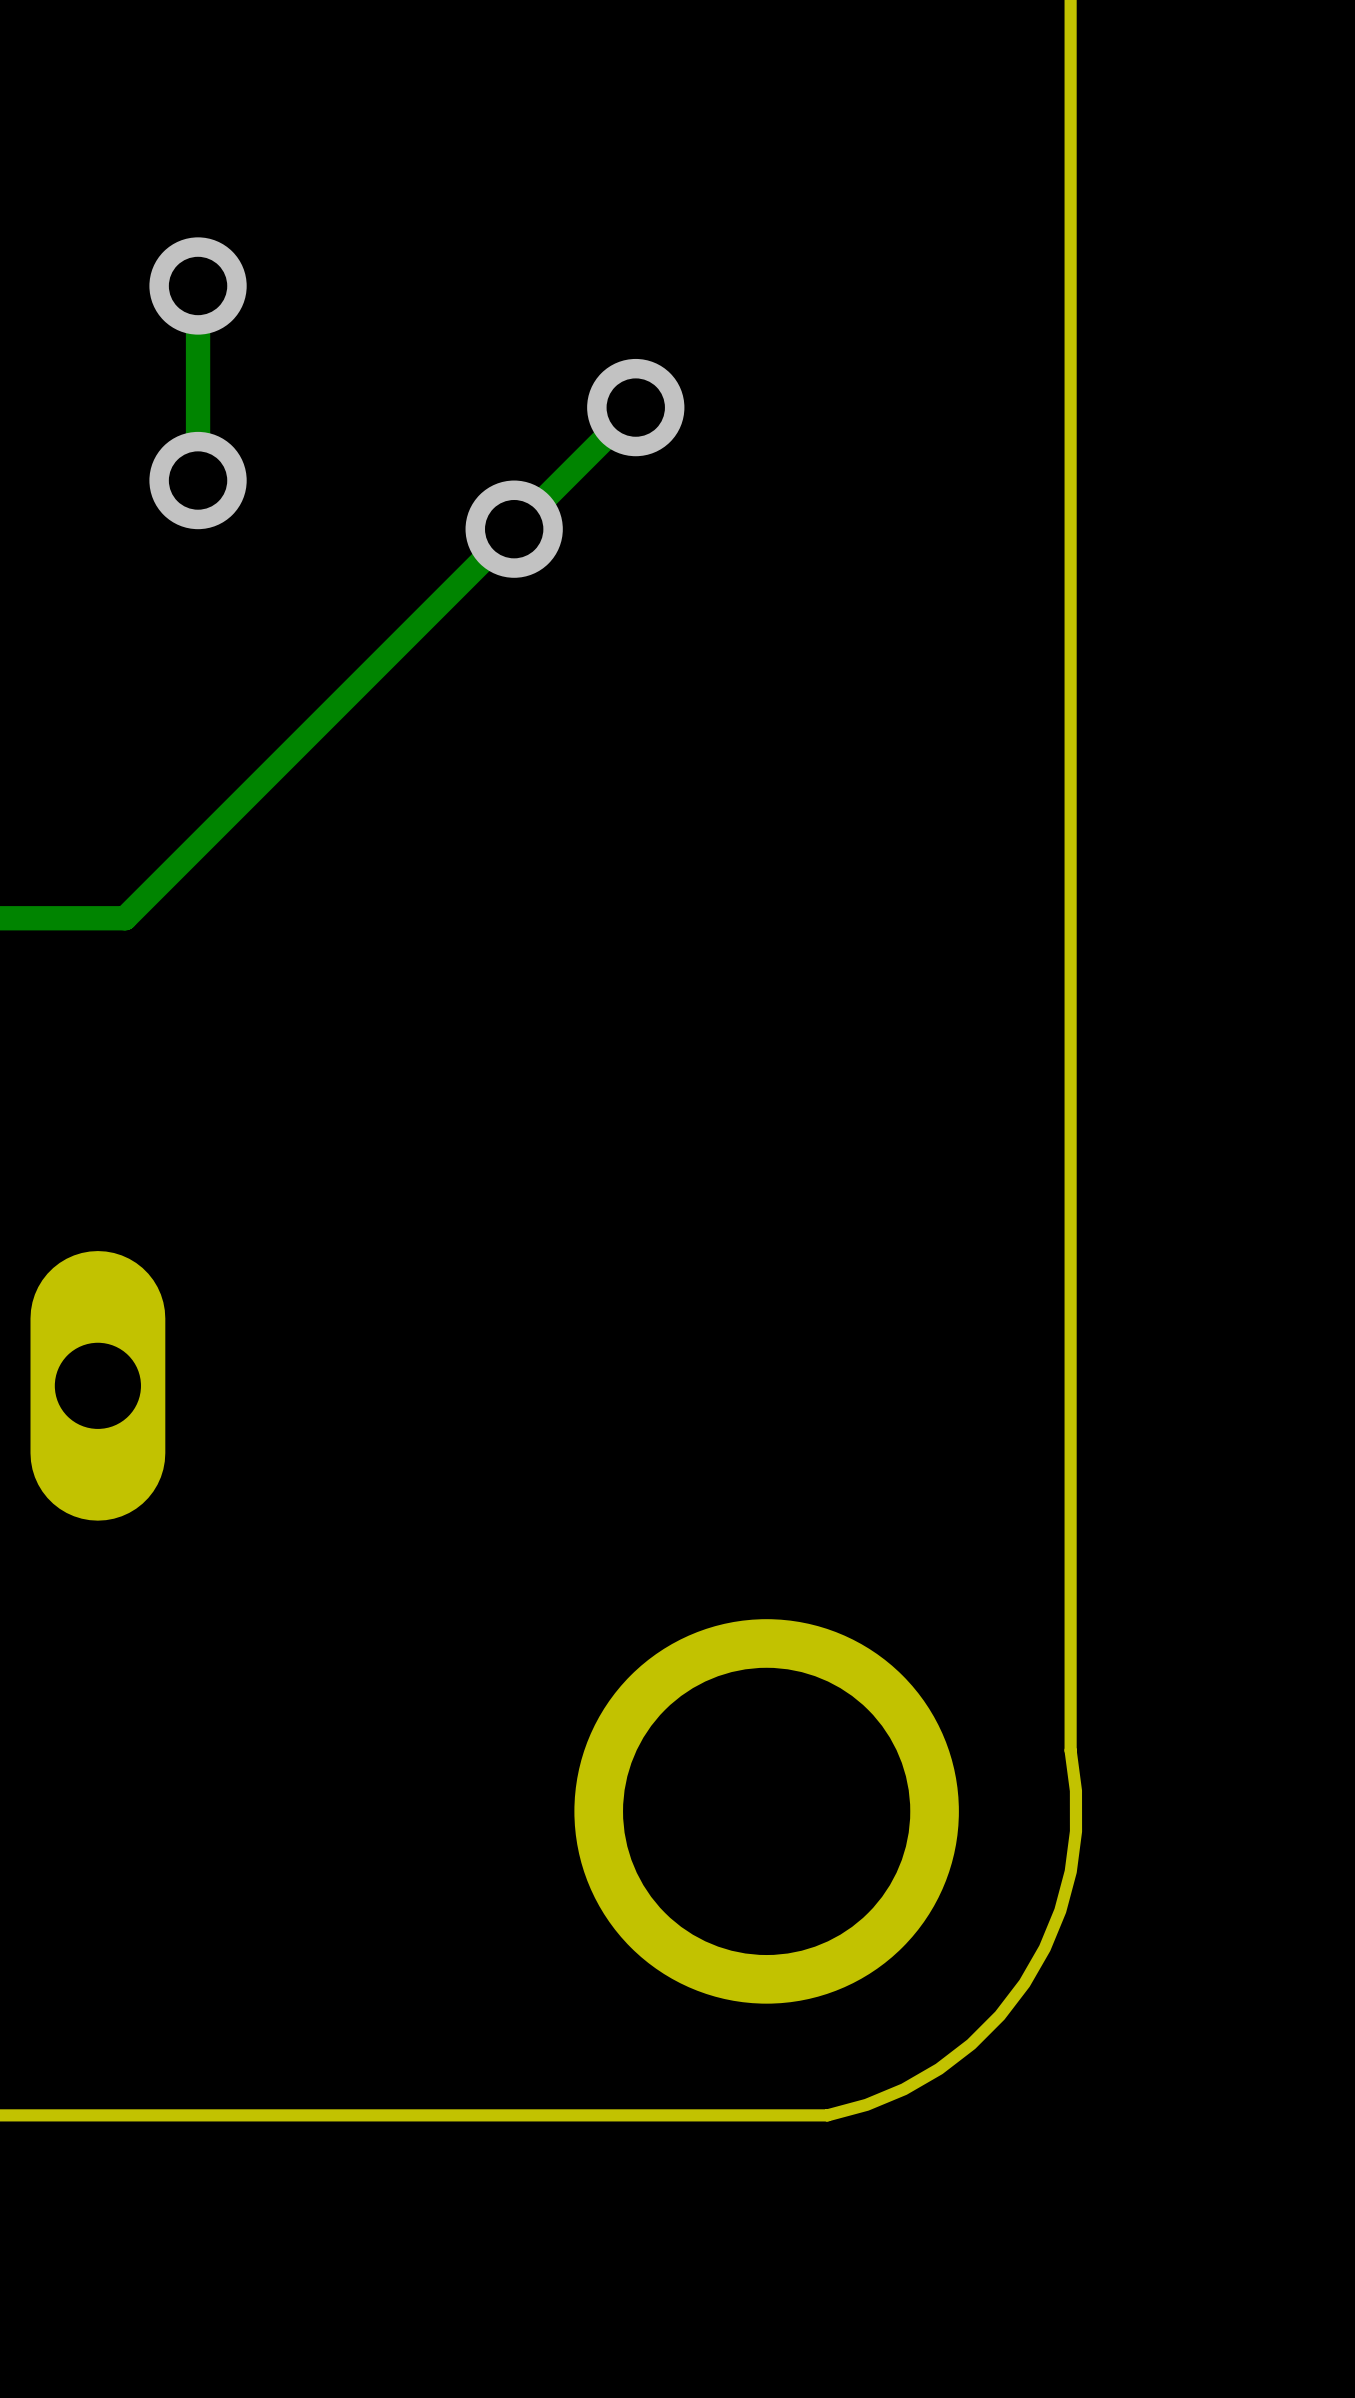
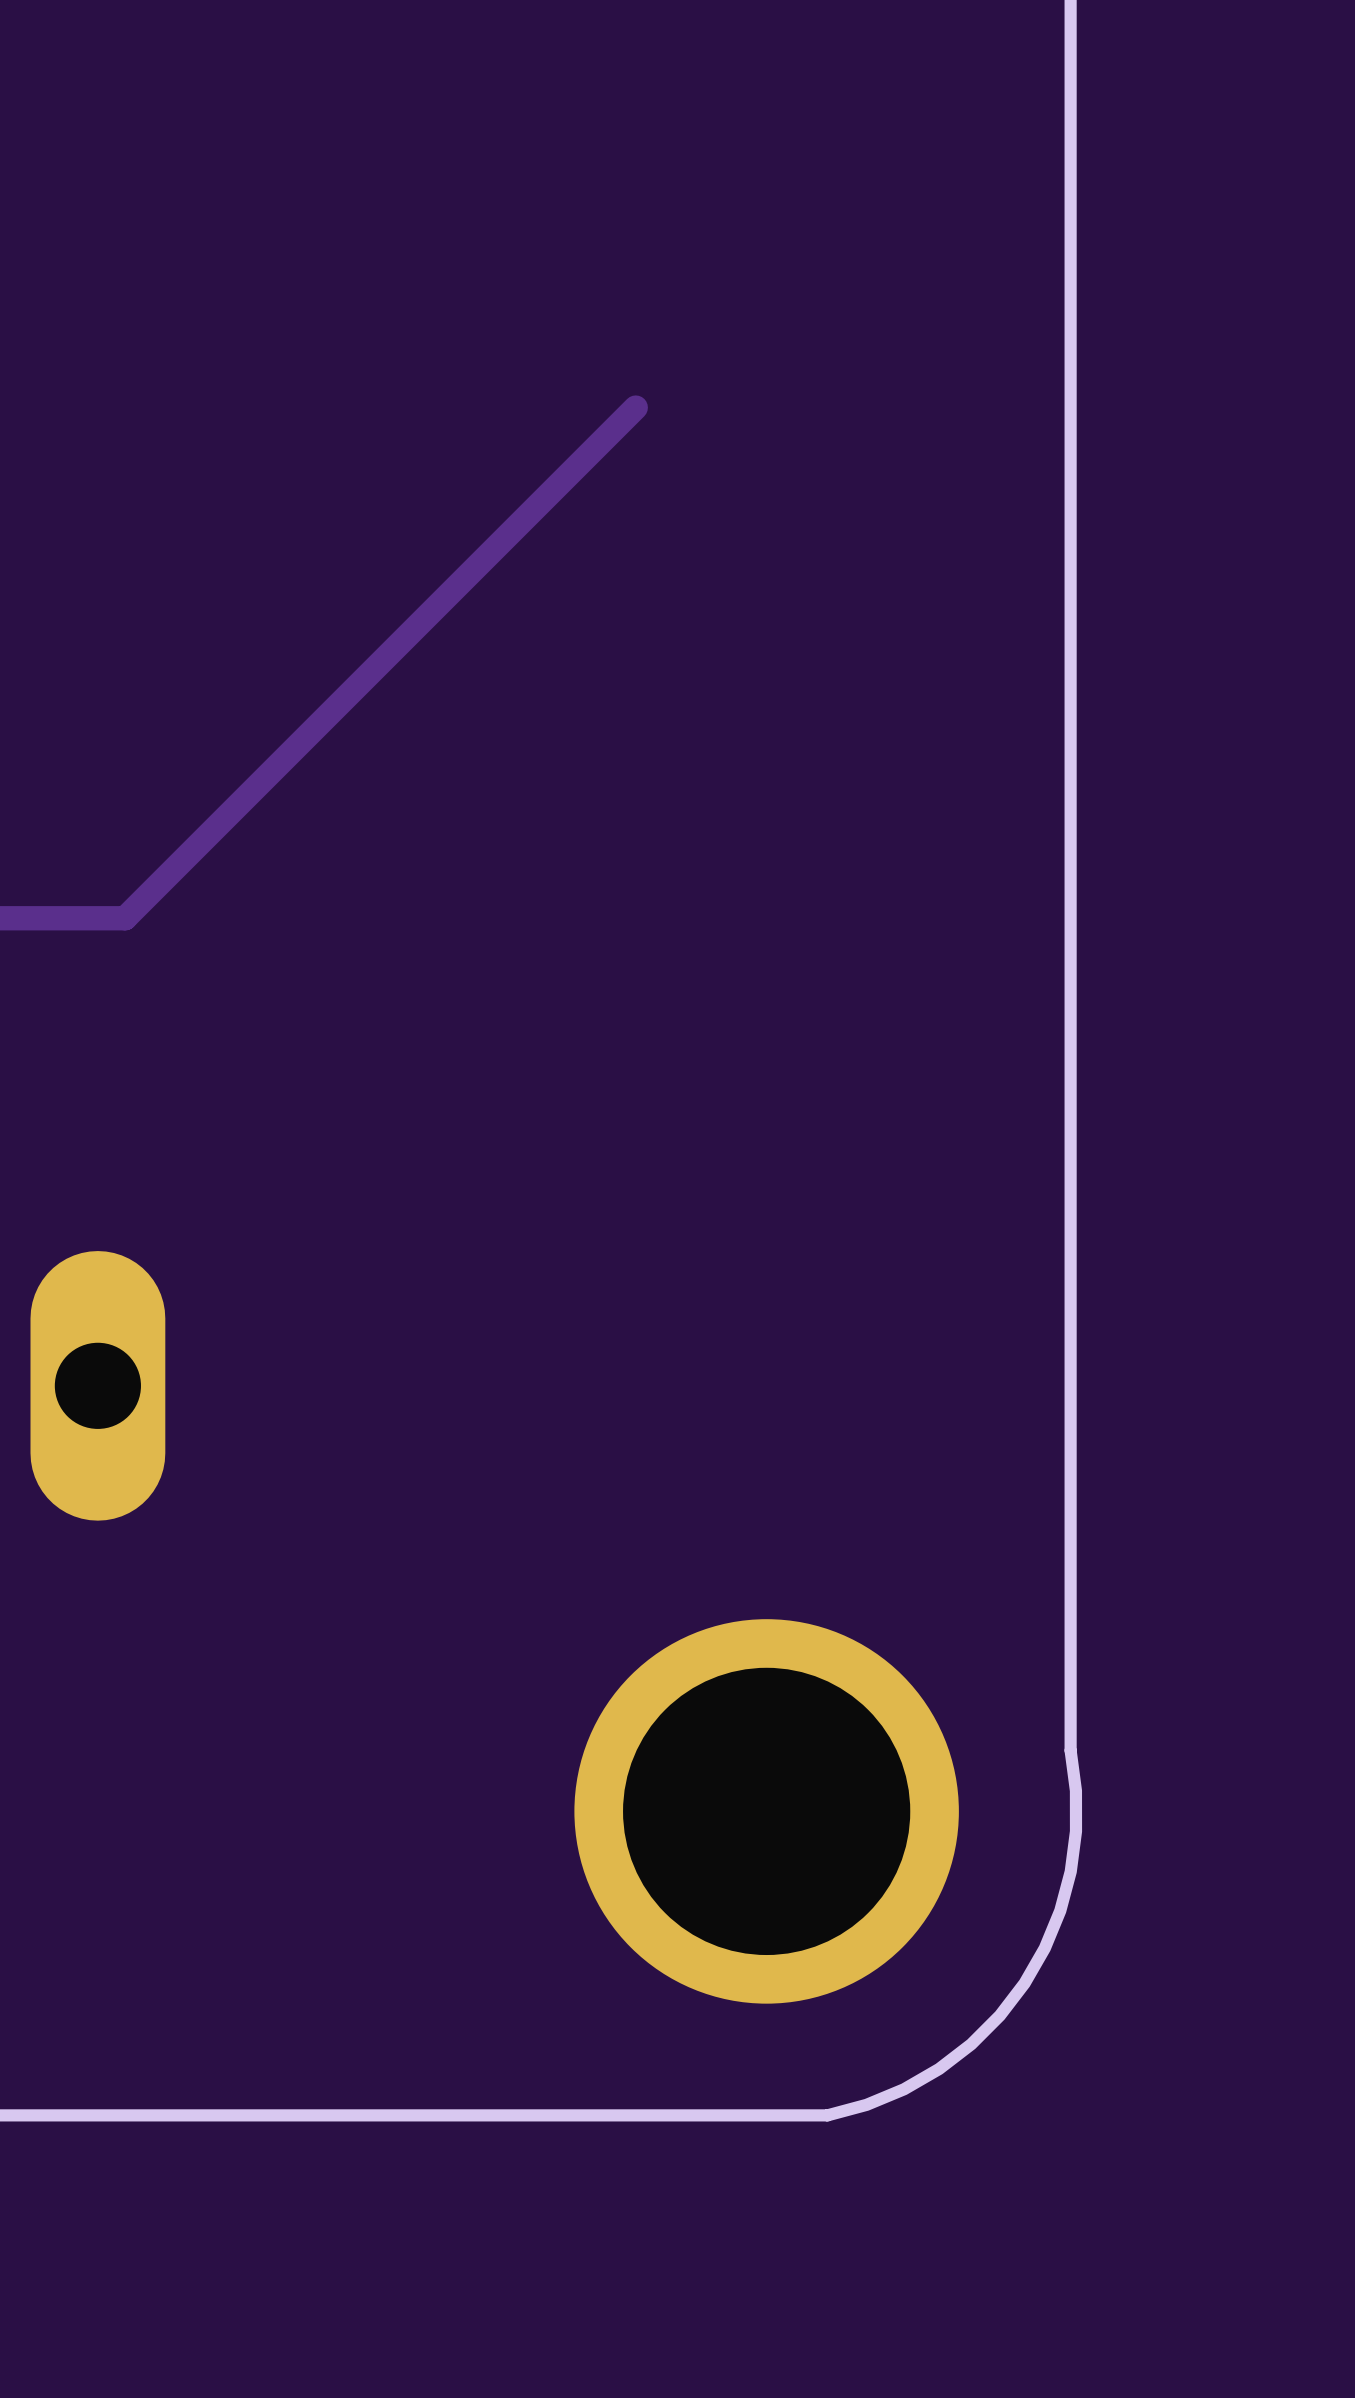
track: (198, 285) (198, 480) -> none
via: (198, 285) -> none
via: (635, 407) -> none
via: (198, 480) -> none
via: (514, 529) -> none

